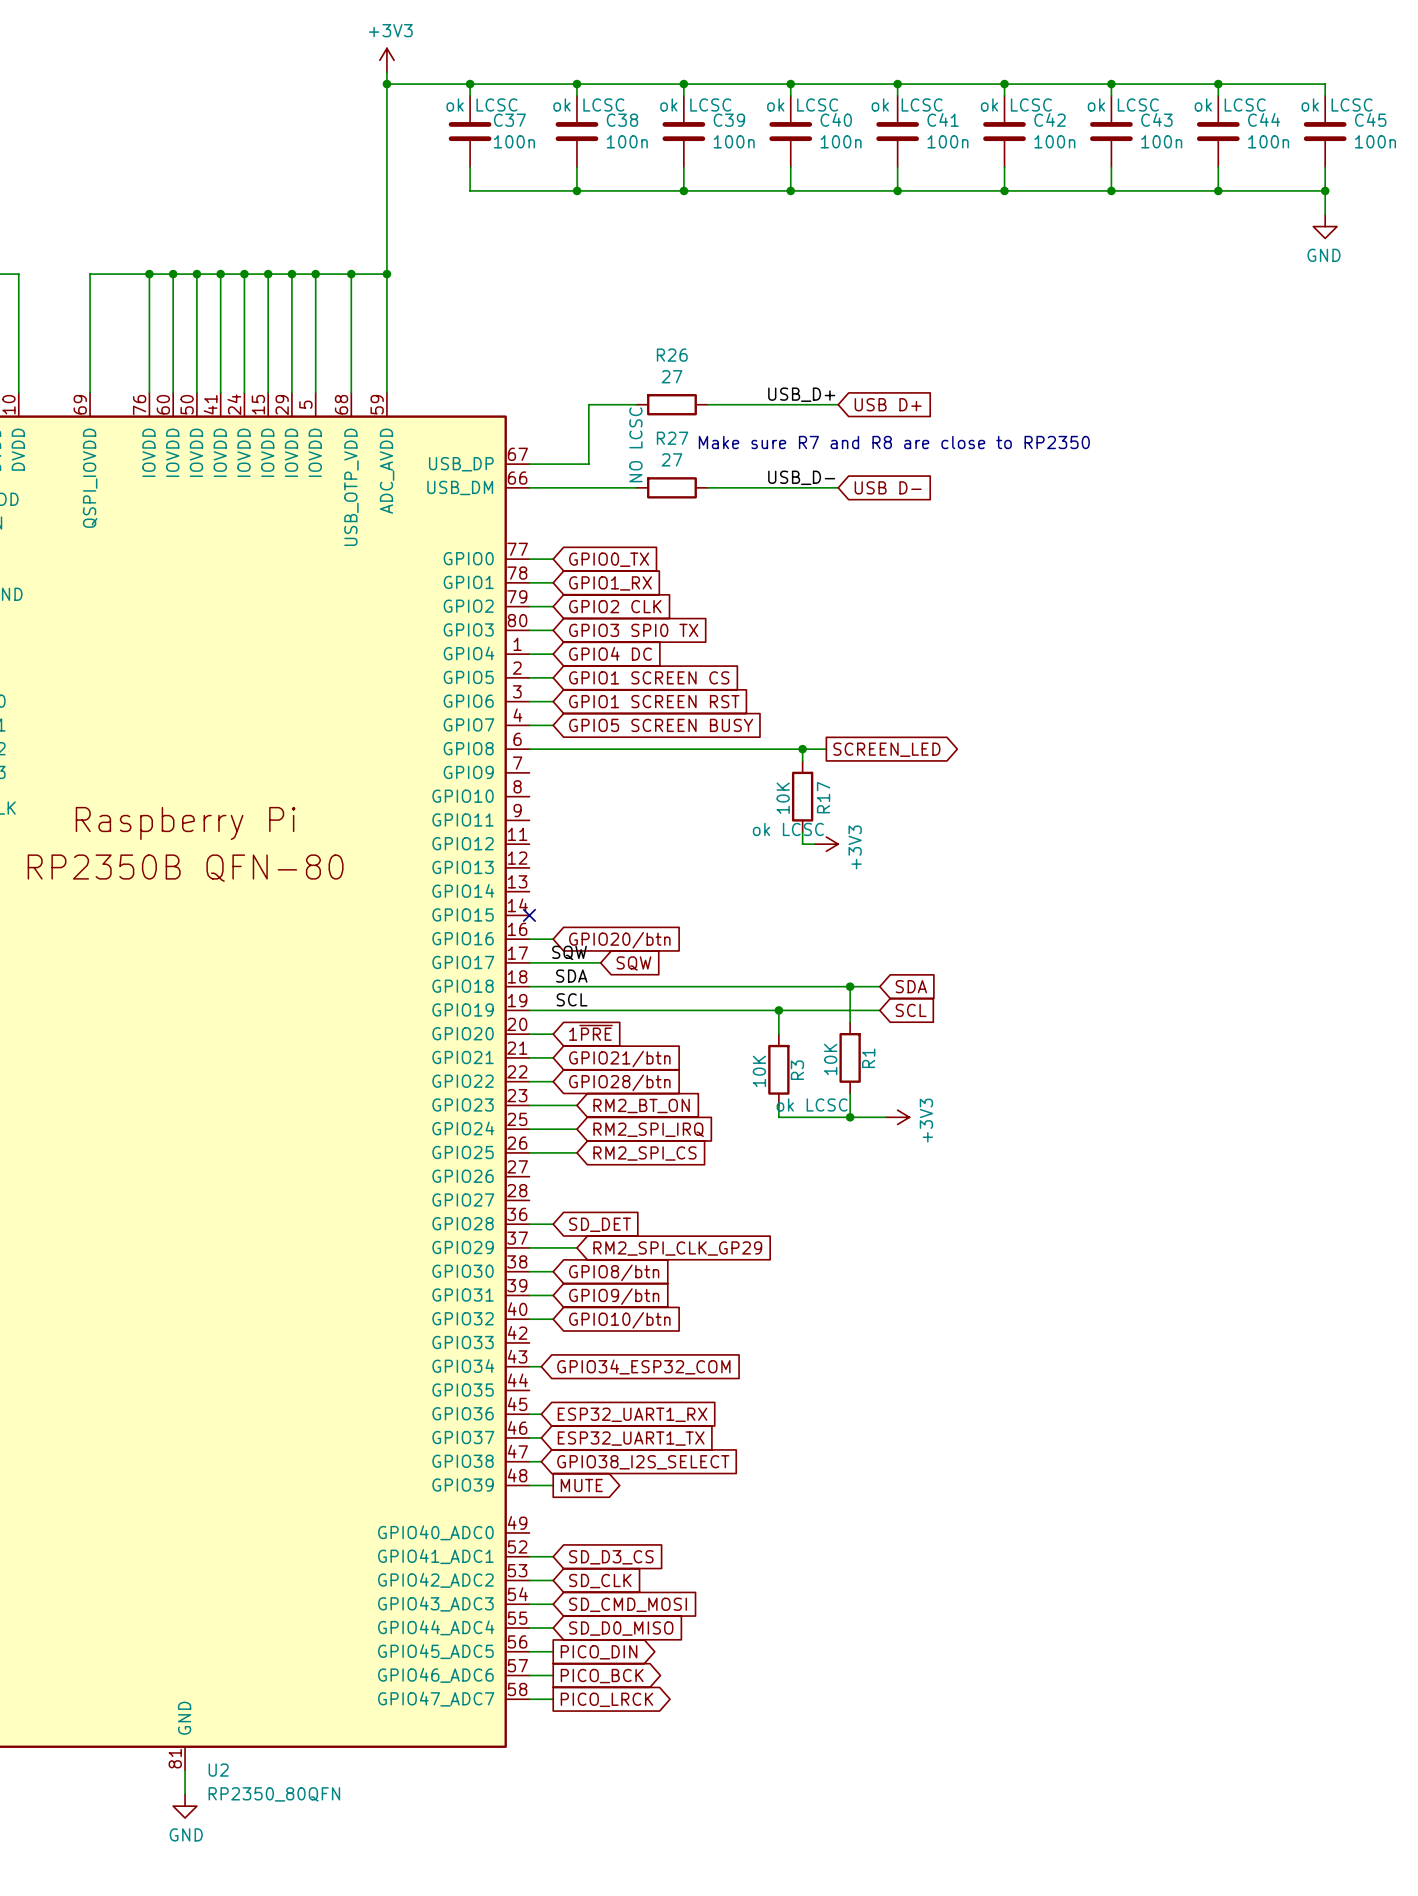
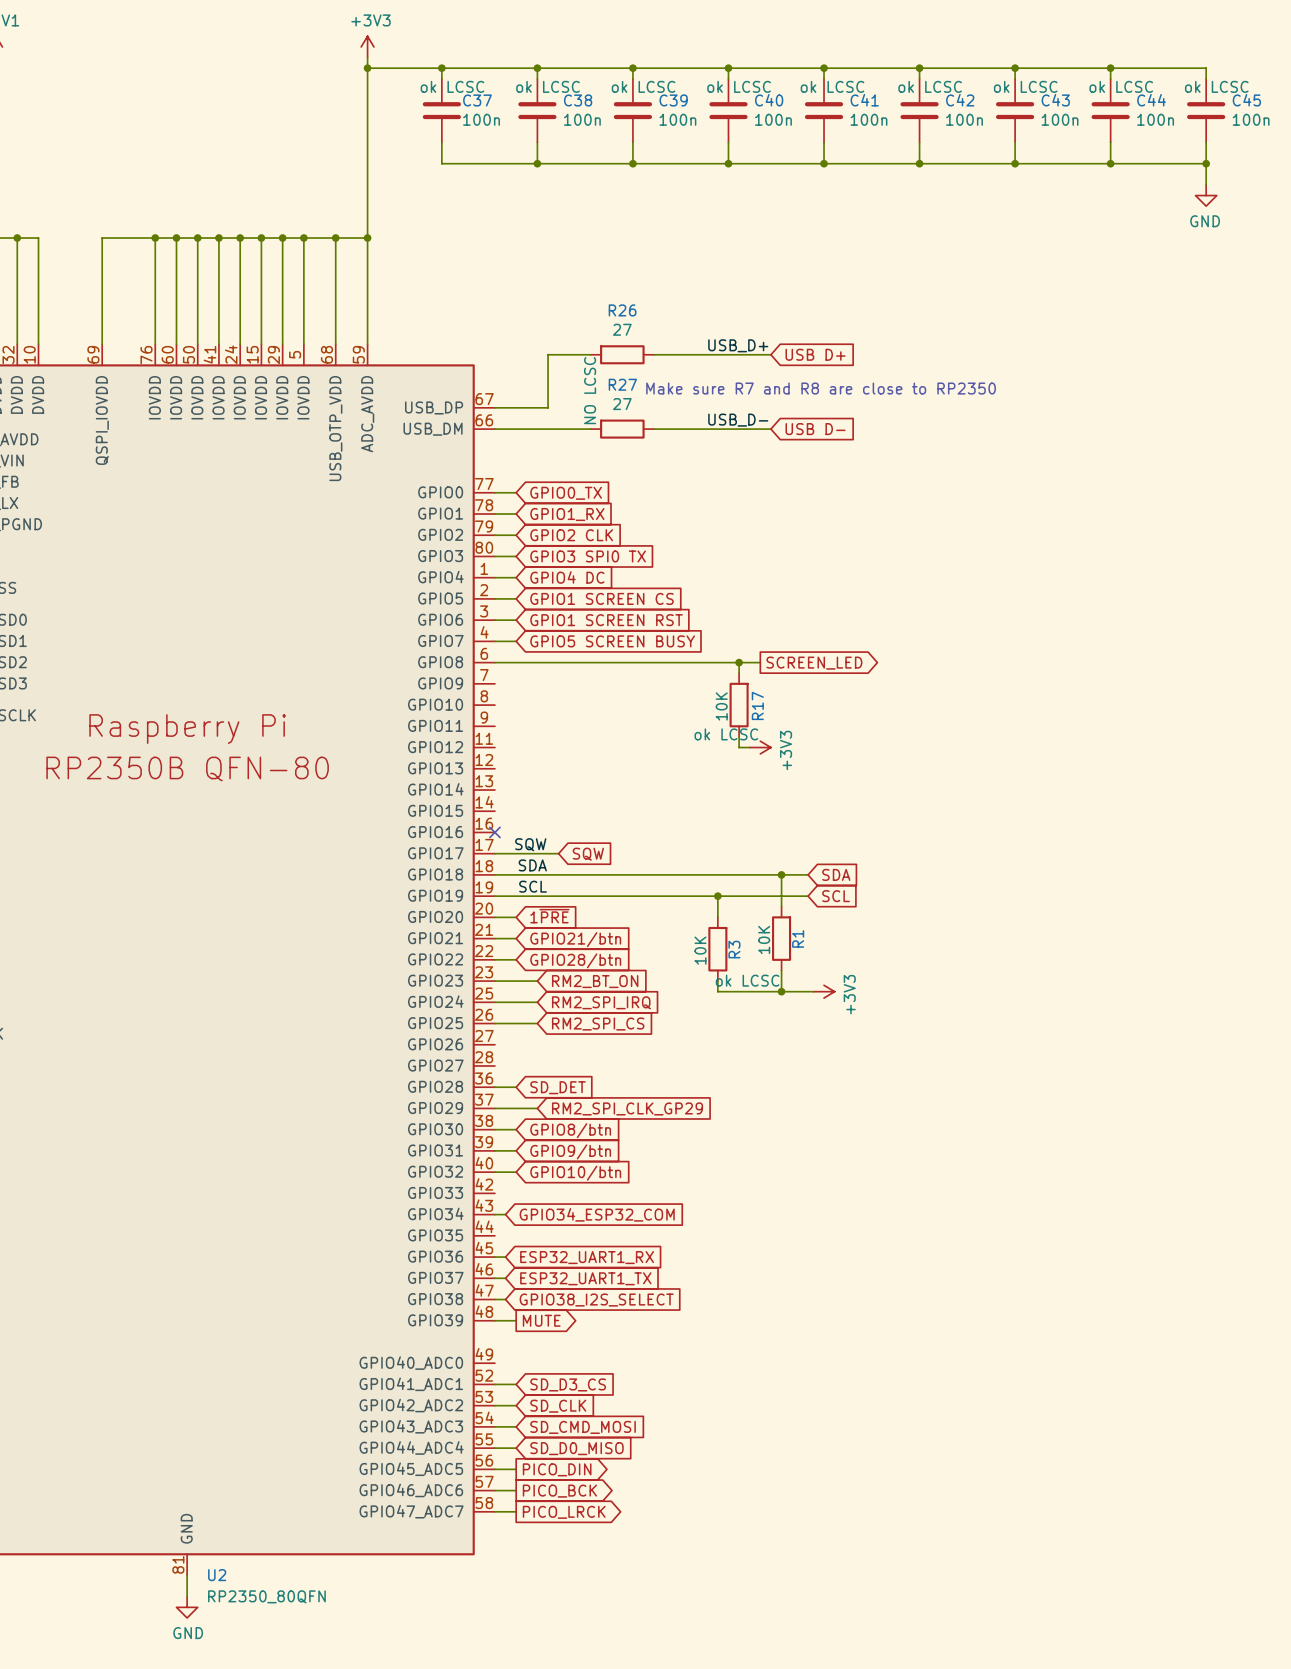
no-connect mark position: (529, 915) -> (494, 832)
wire: (529, 939) (553, 939) -> none
global label: GPIO20/btn (619, 940) -> none

